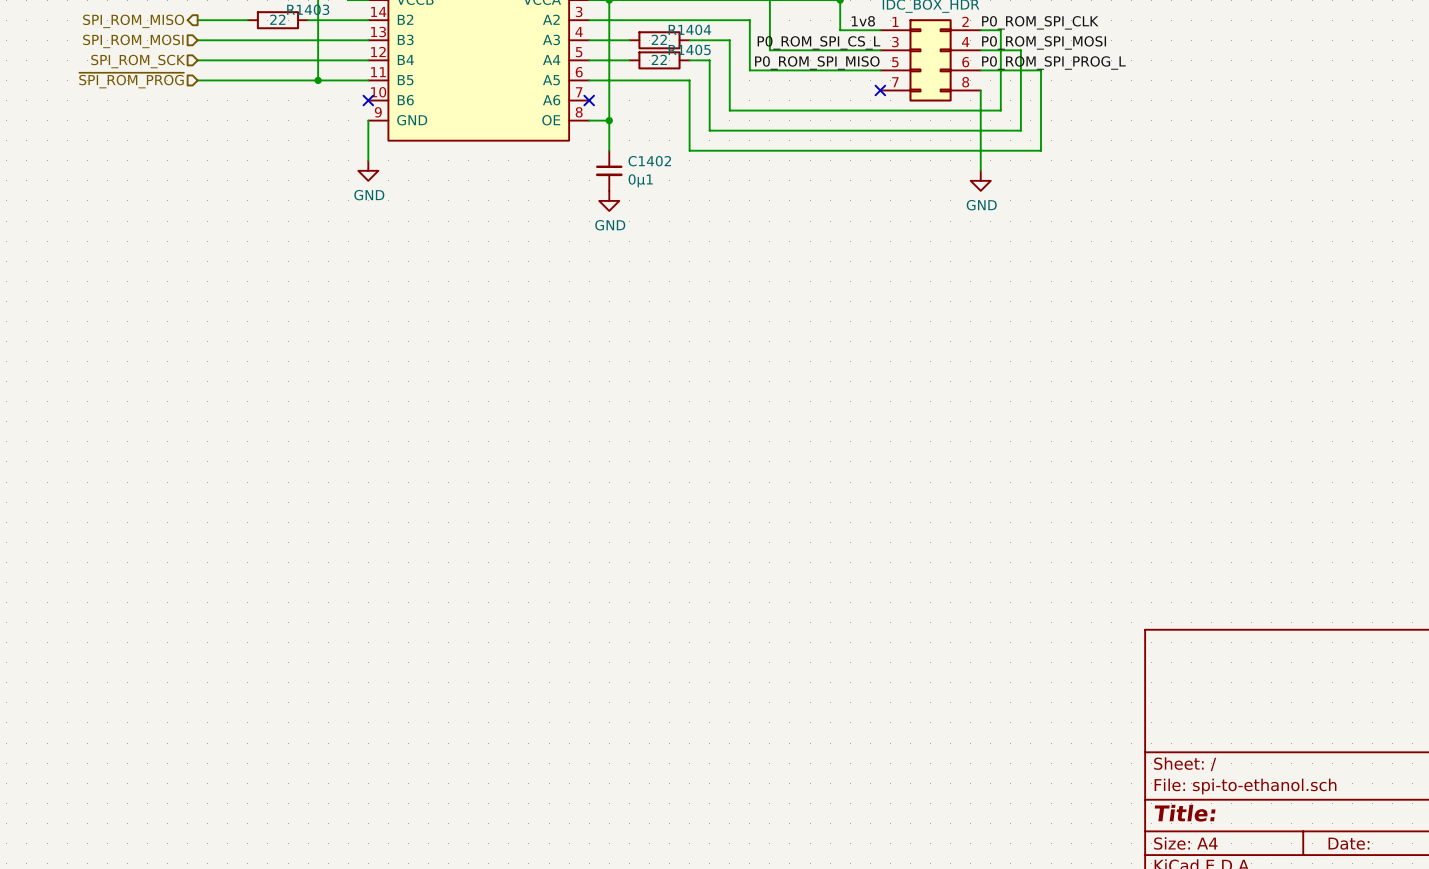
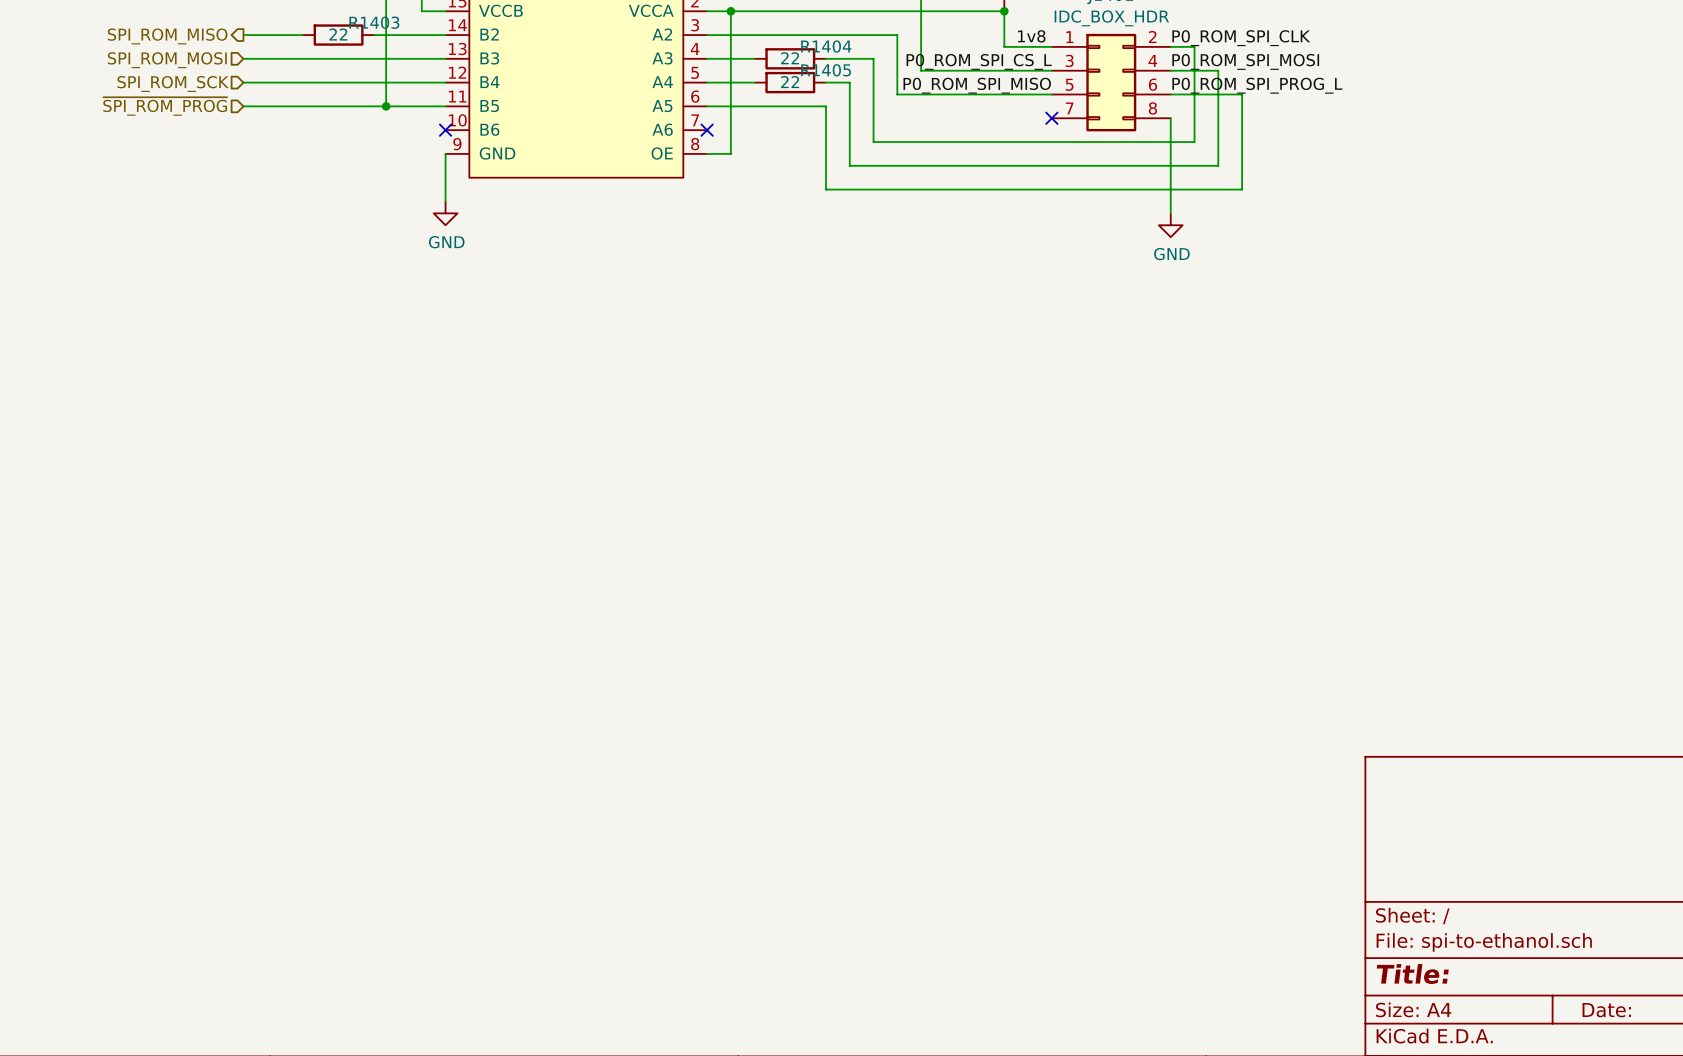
wire: (609, 120) (609, 150) -> none
junction: (609, 120) -> none
C1402: 0µ1 (609, 170) -> none
power symbol: GND (609, 200) -> none

